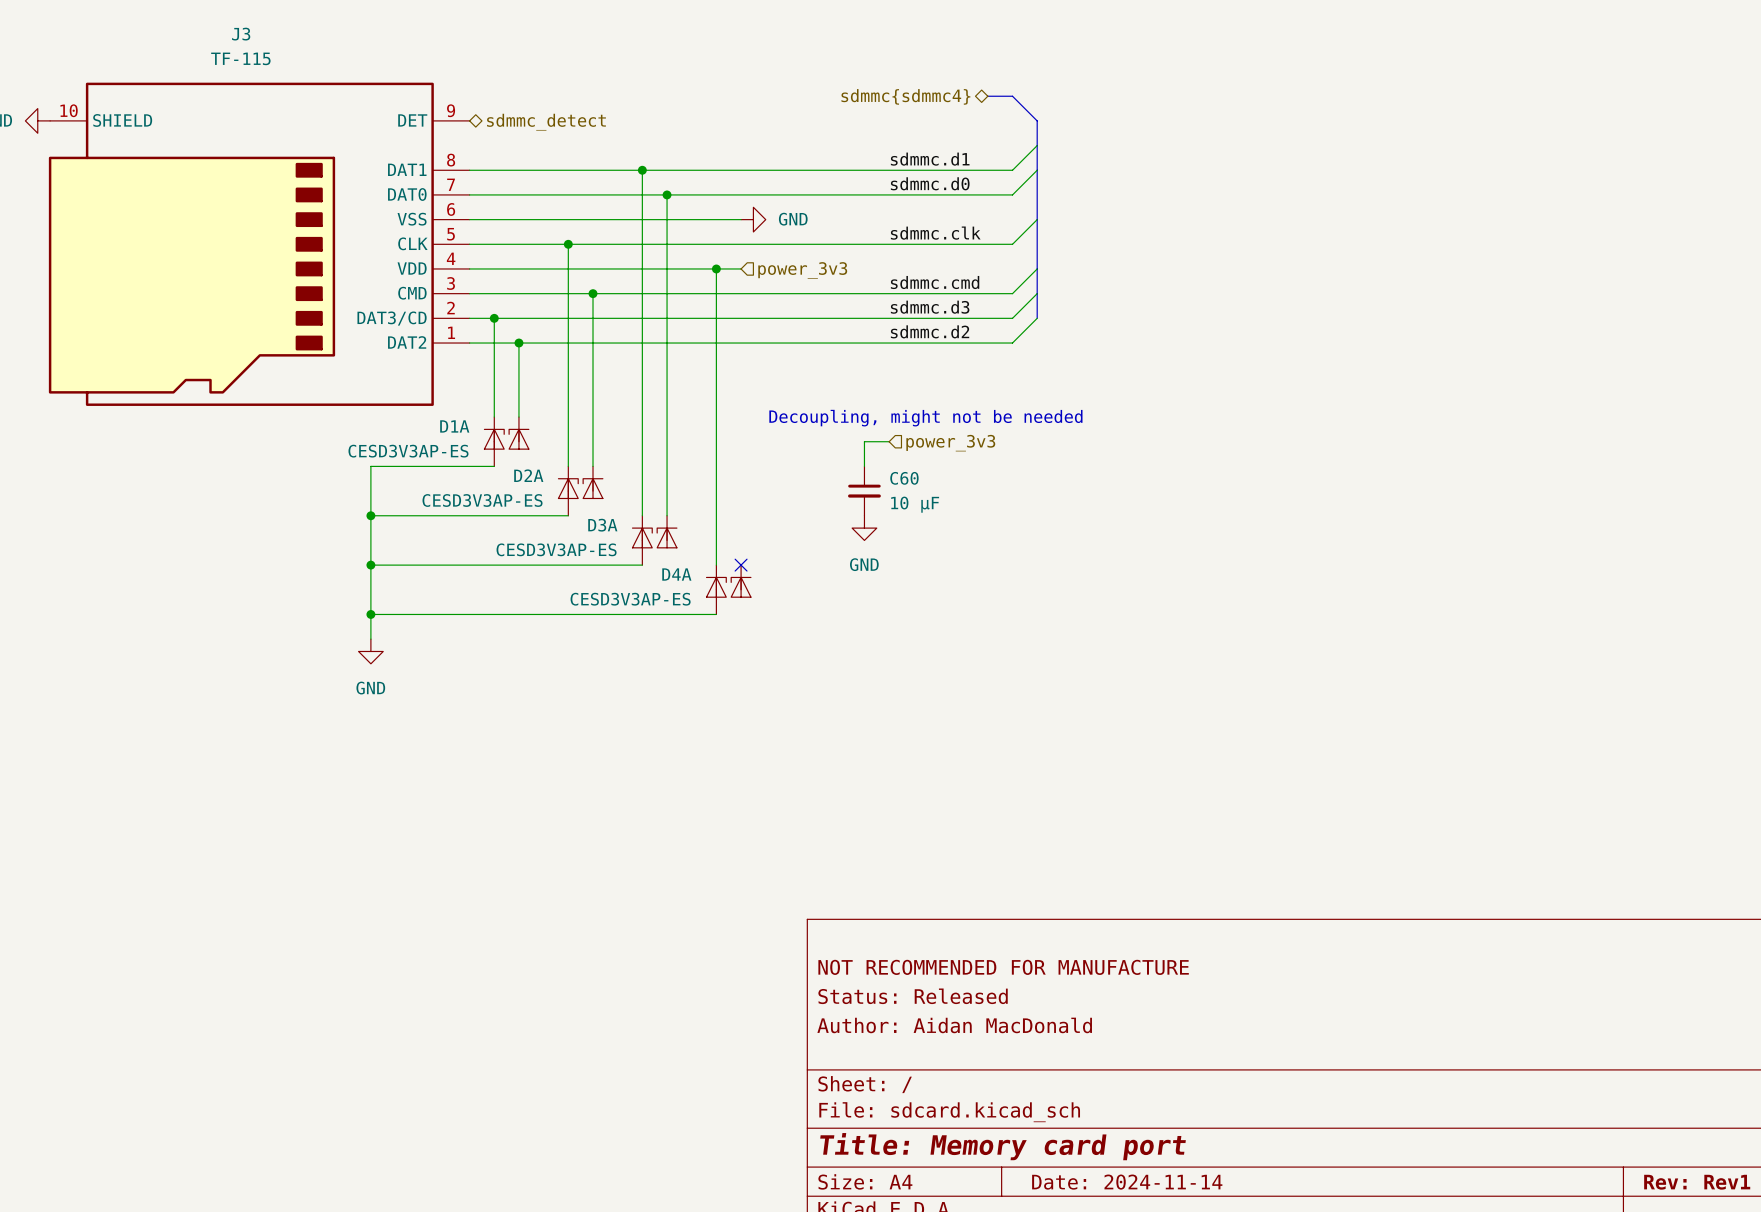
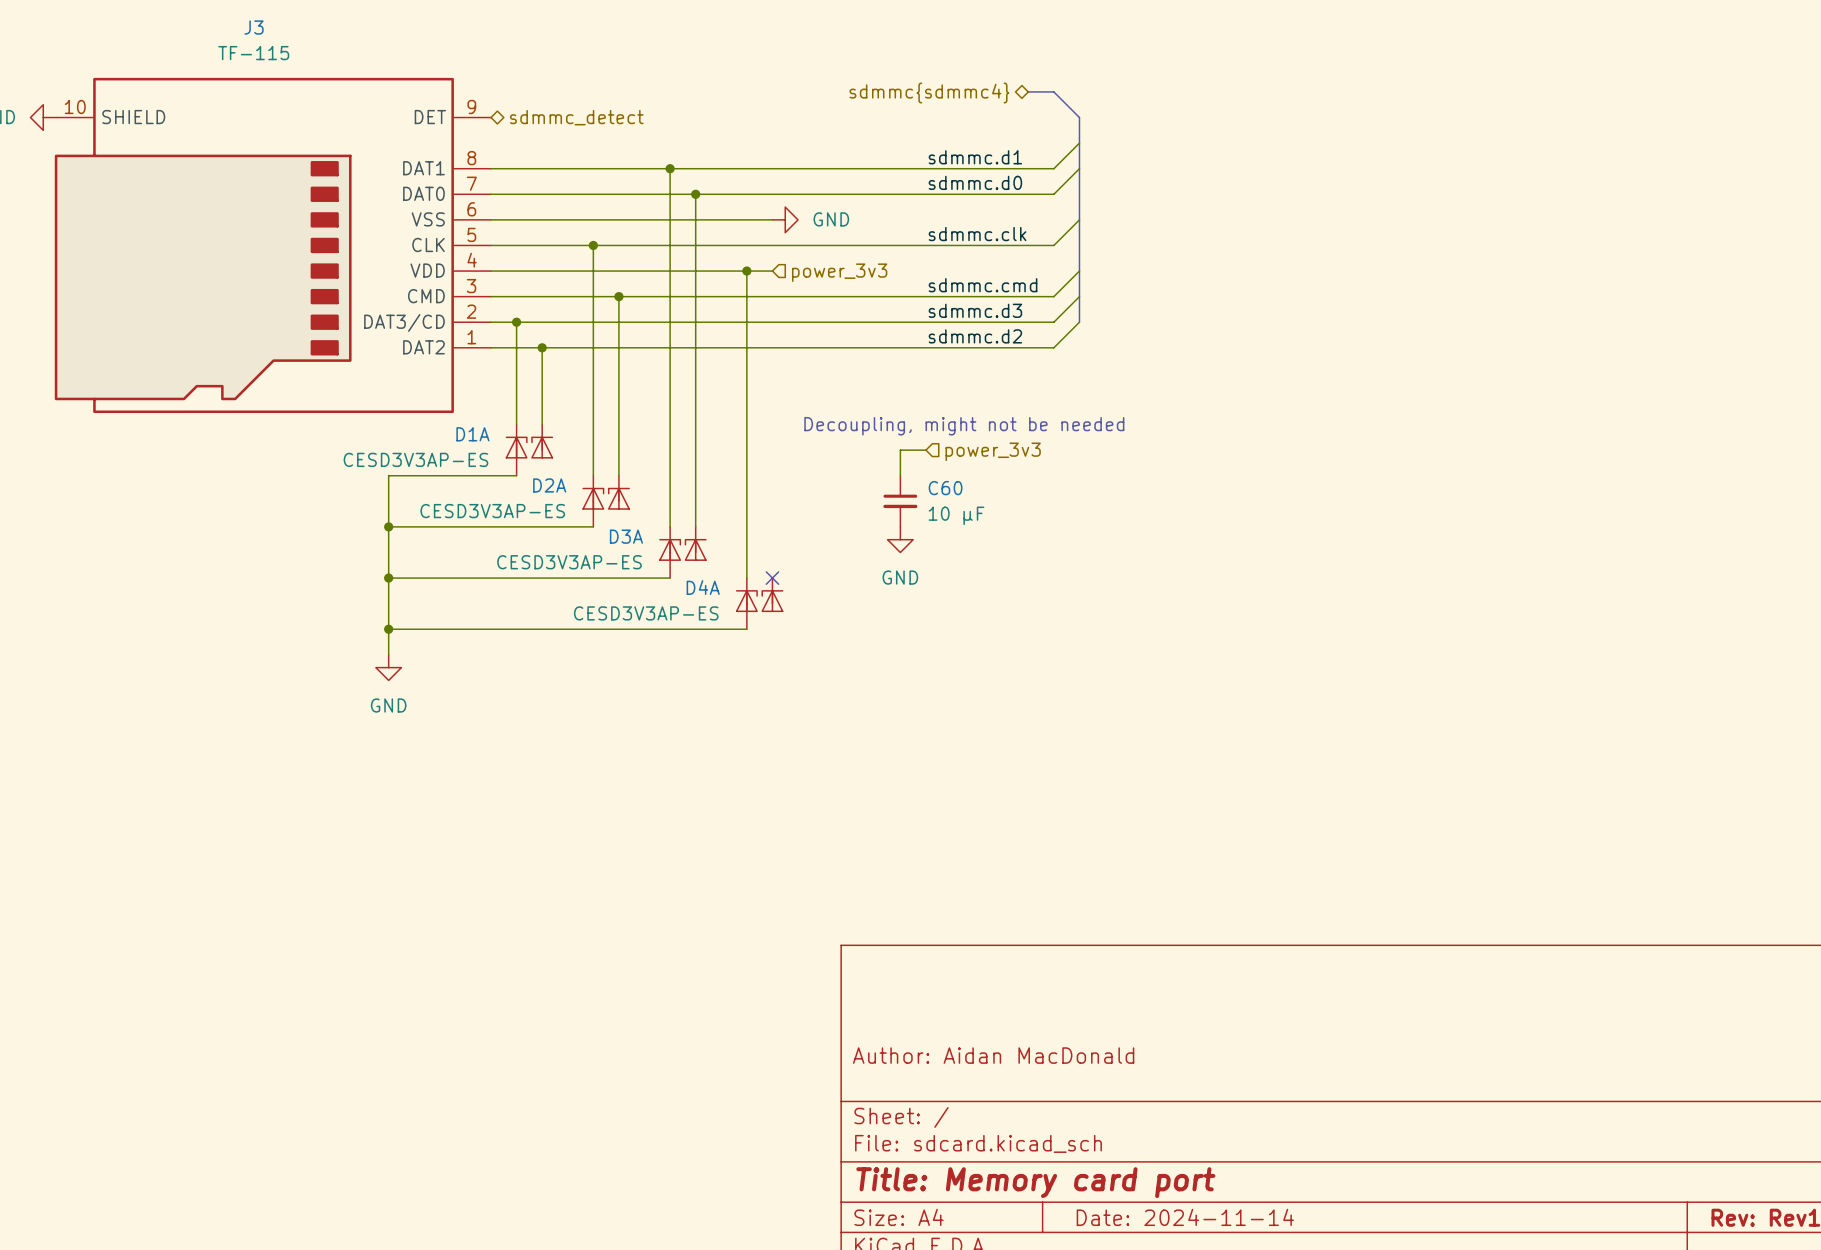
title block: NOT RECOMMENDED FOR MANUFACTURE (1003, 967) -> none
title block: Status: Released (913, 996) -> none

